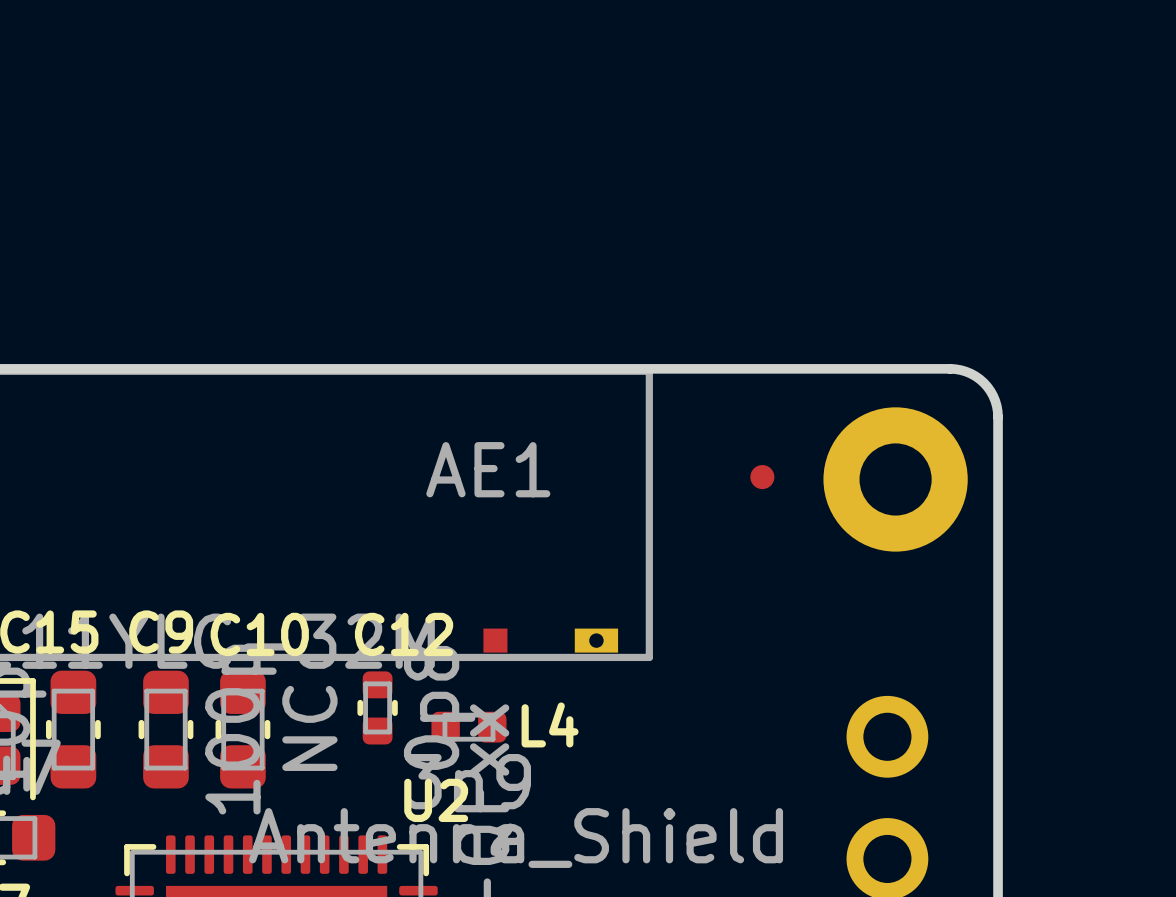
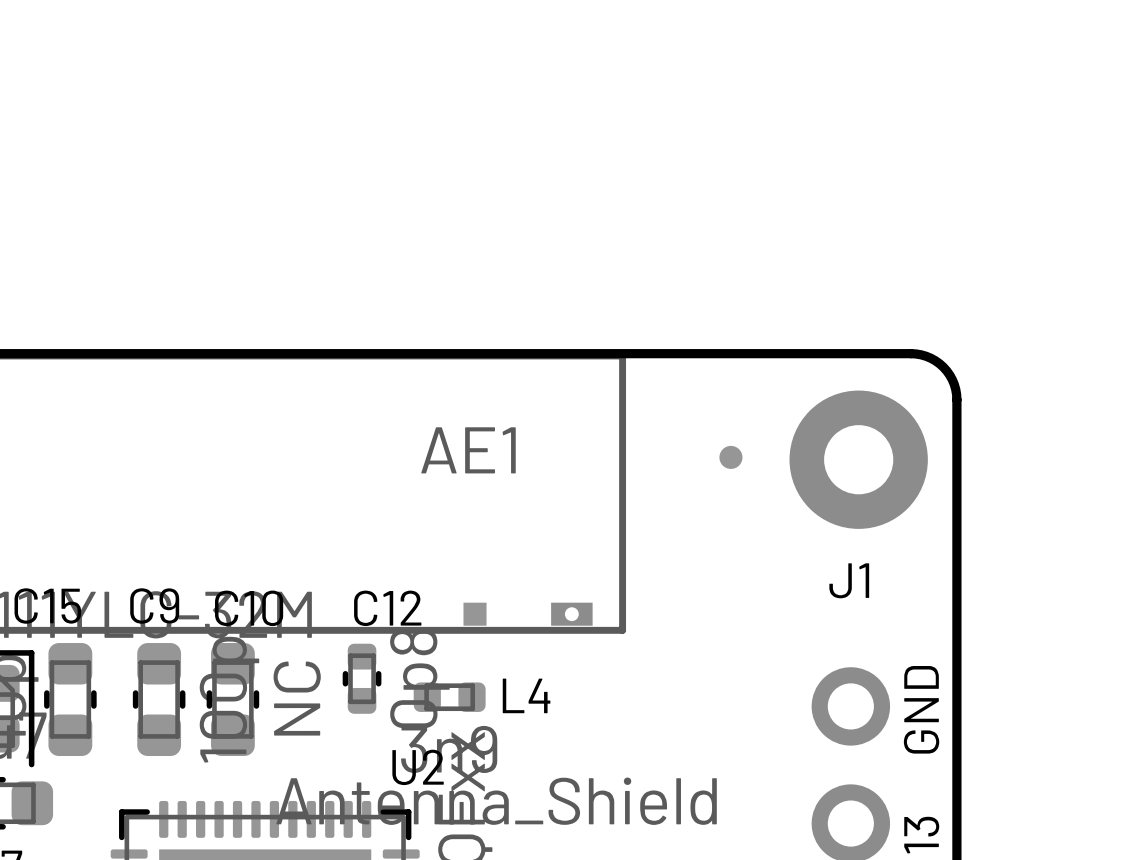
J1 name: none -> J1 (849, 580)
text: none -> GND (921, 709)
text: none -> 13 (921, 835)

